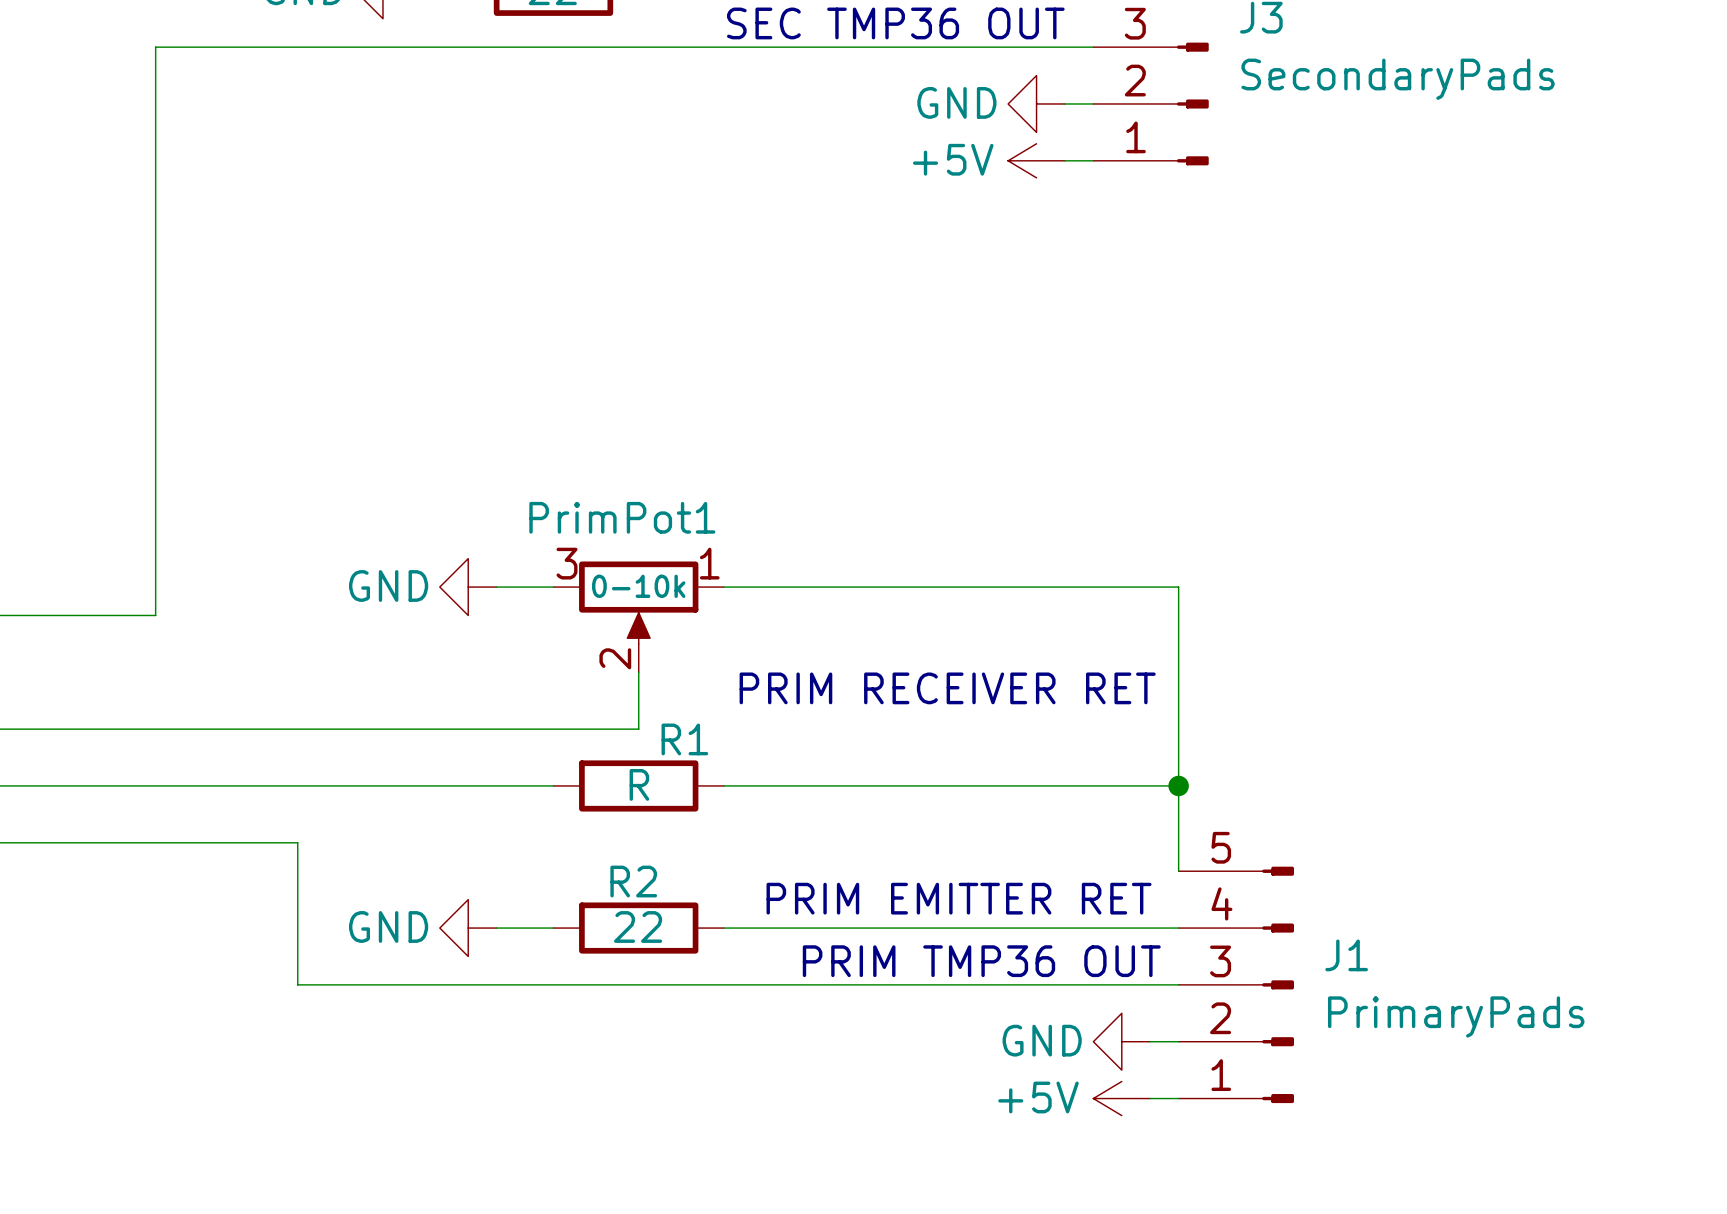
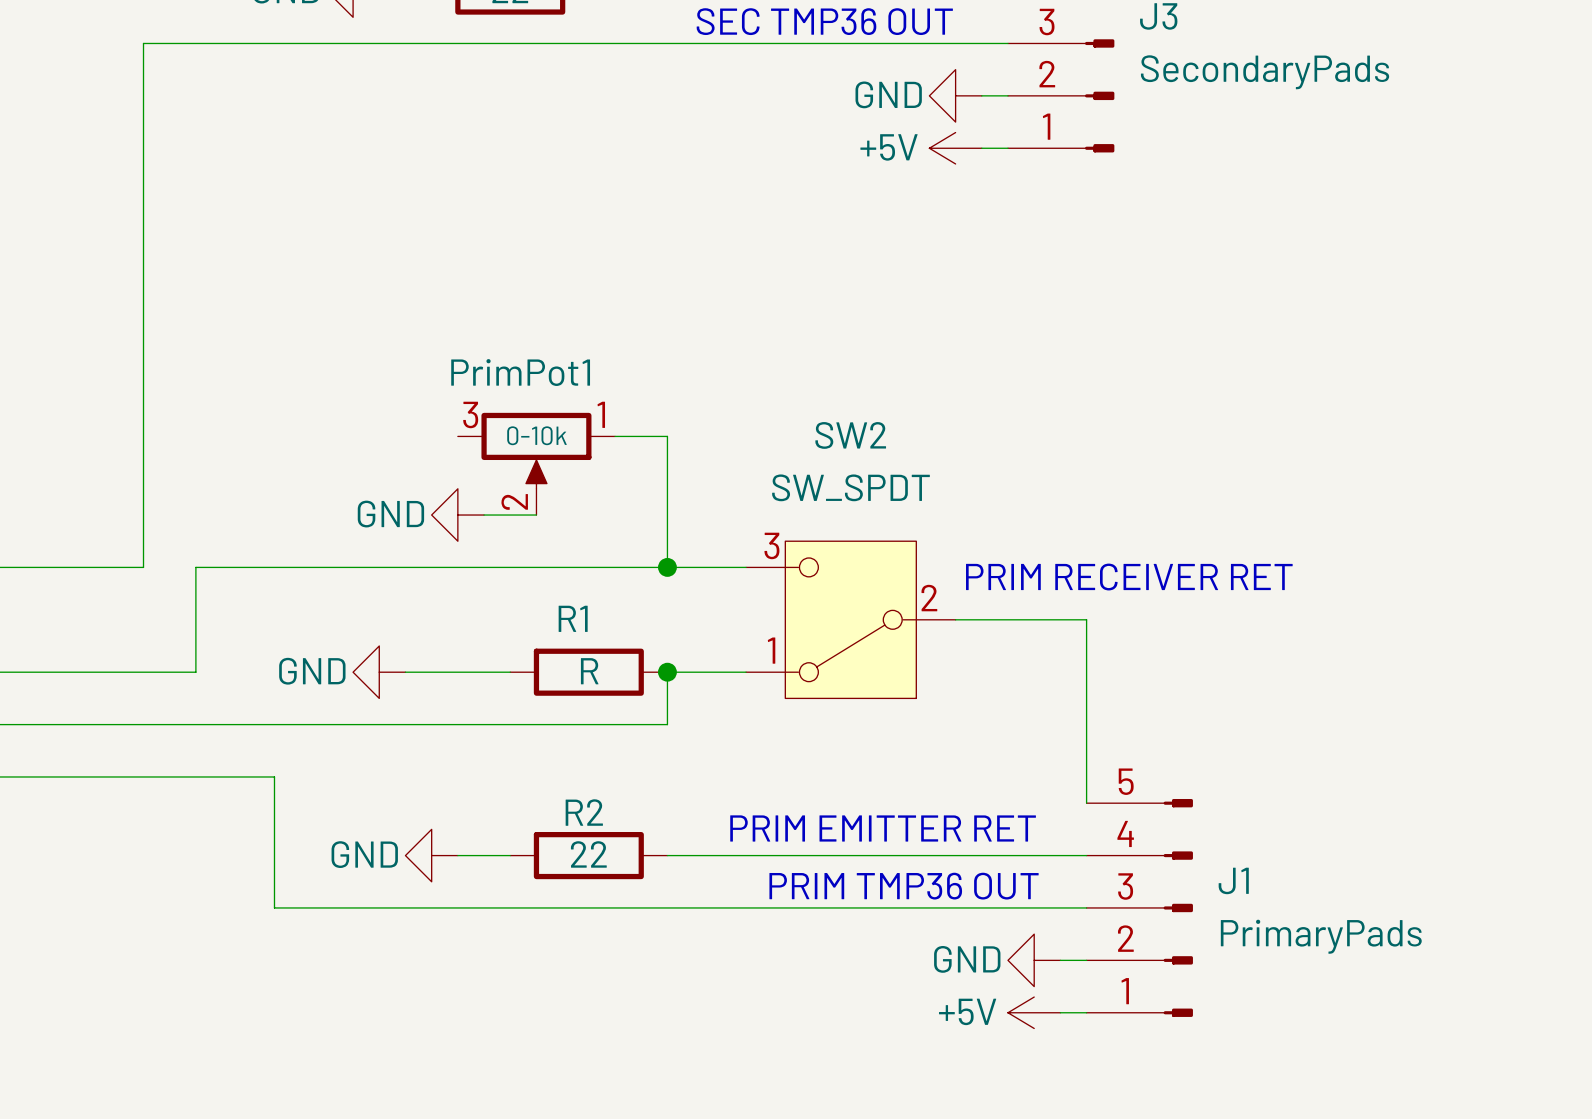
wire: none -> (615, 436) (667, 436) (667, 567)
power symbol position: GND (468, 587) -> GND (457, 515)
wire: (496, 587) (553, 587) -> (484, 515) (536, 515)
wire: (723, 587) (1178, 587) (1178, 672) -> (955, 619) (1086, 619)
junction: none -> (667, 567)
PrimPot1 position: (638, 616) -> (536, 463)
wire: (638, 672) (638, 729) (553, 729) -> none
SW2: none -> SW_SPDT (850, 619)
text position: PRIM RECEIVER RET (947, 688) -> PRIM RECEIVER RET (1129, 577)
wire: (212, 729) (439, 729) -> (195, 672) (195, 567) (746, 567)
power symbol: none -> GND (379, 672)
junction: none -> (667, 672)
wire: none -> (746, 672) (667, 672) (667, 724) (510, 724)
R1 name position: R1 (684, 739) -> R1 (573, 618)
R1 position: (638, 785) -> (588, 672)
wire: (723, 785) (1178, 785) -> none
junction: (1178, 785) -> none

